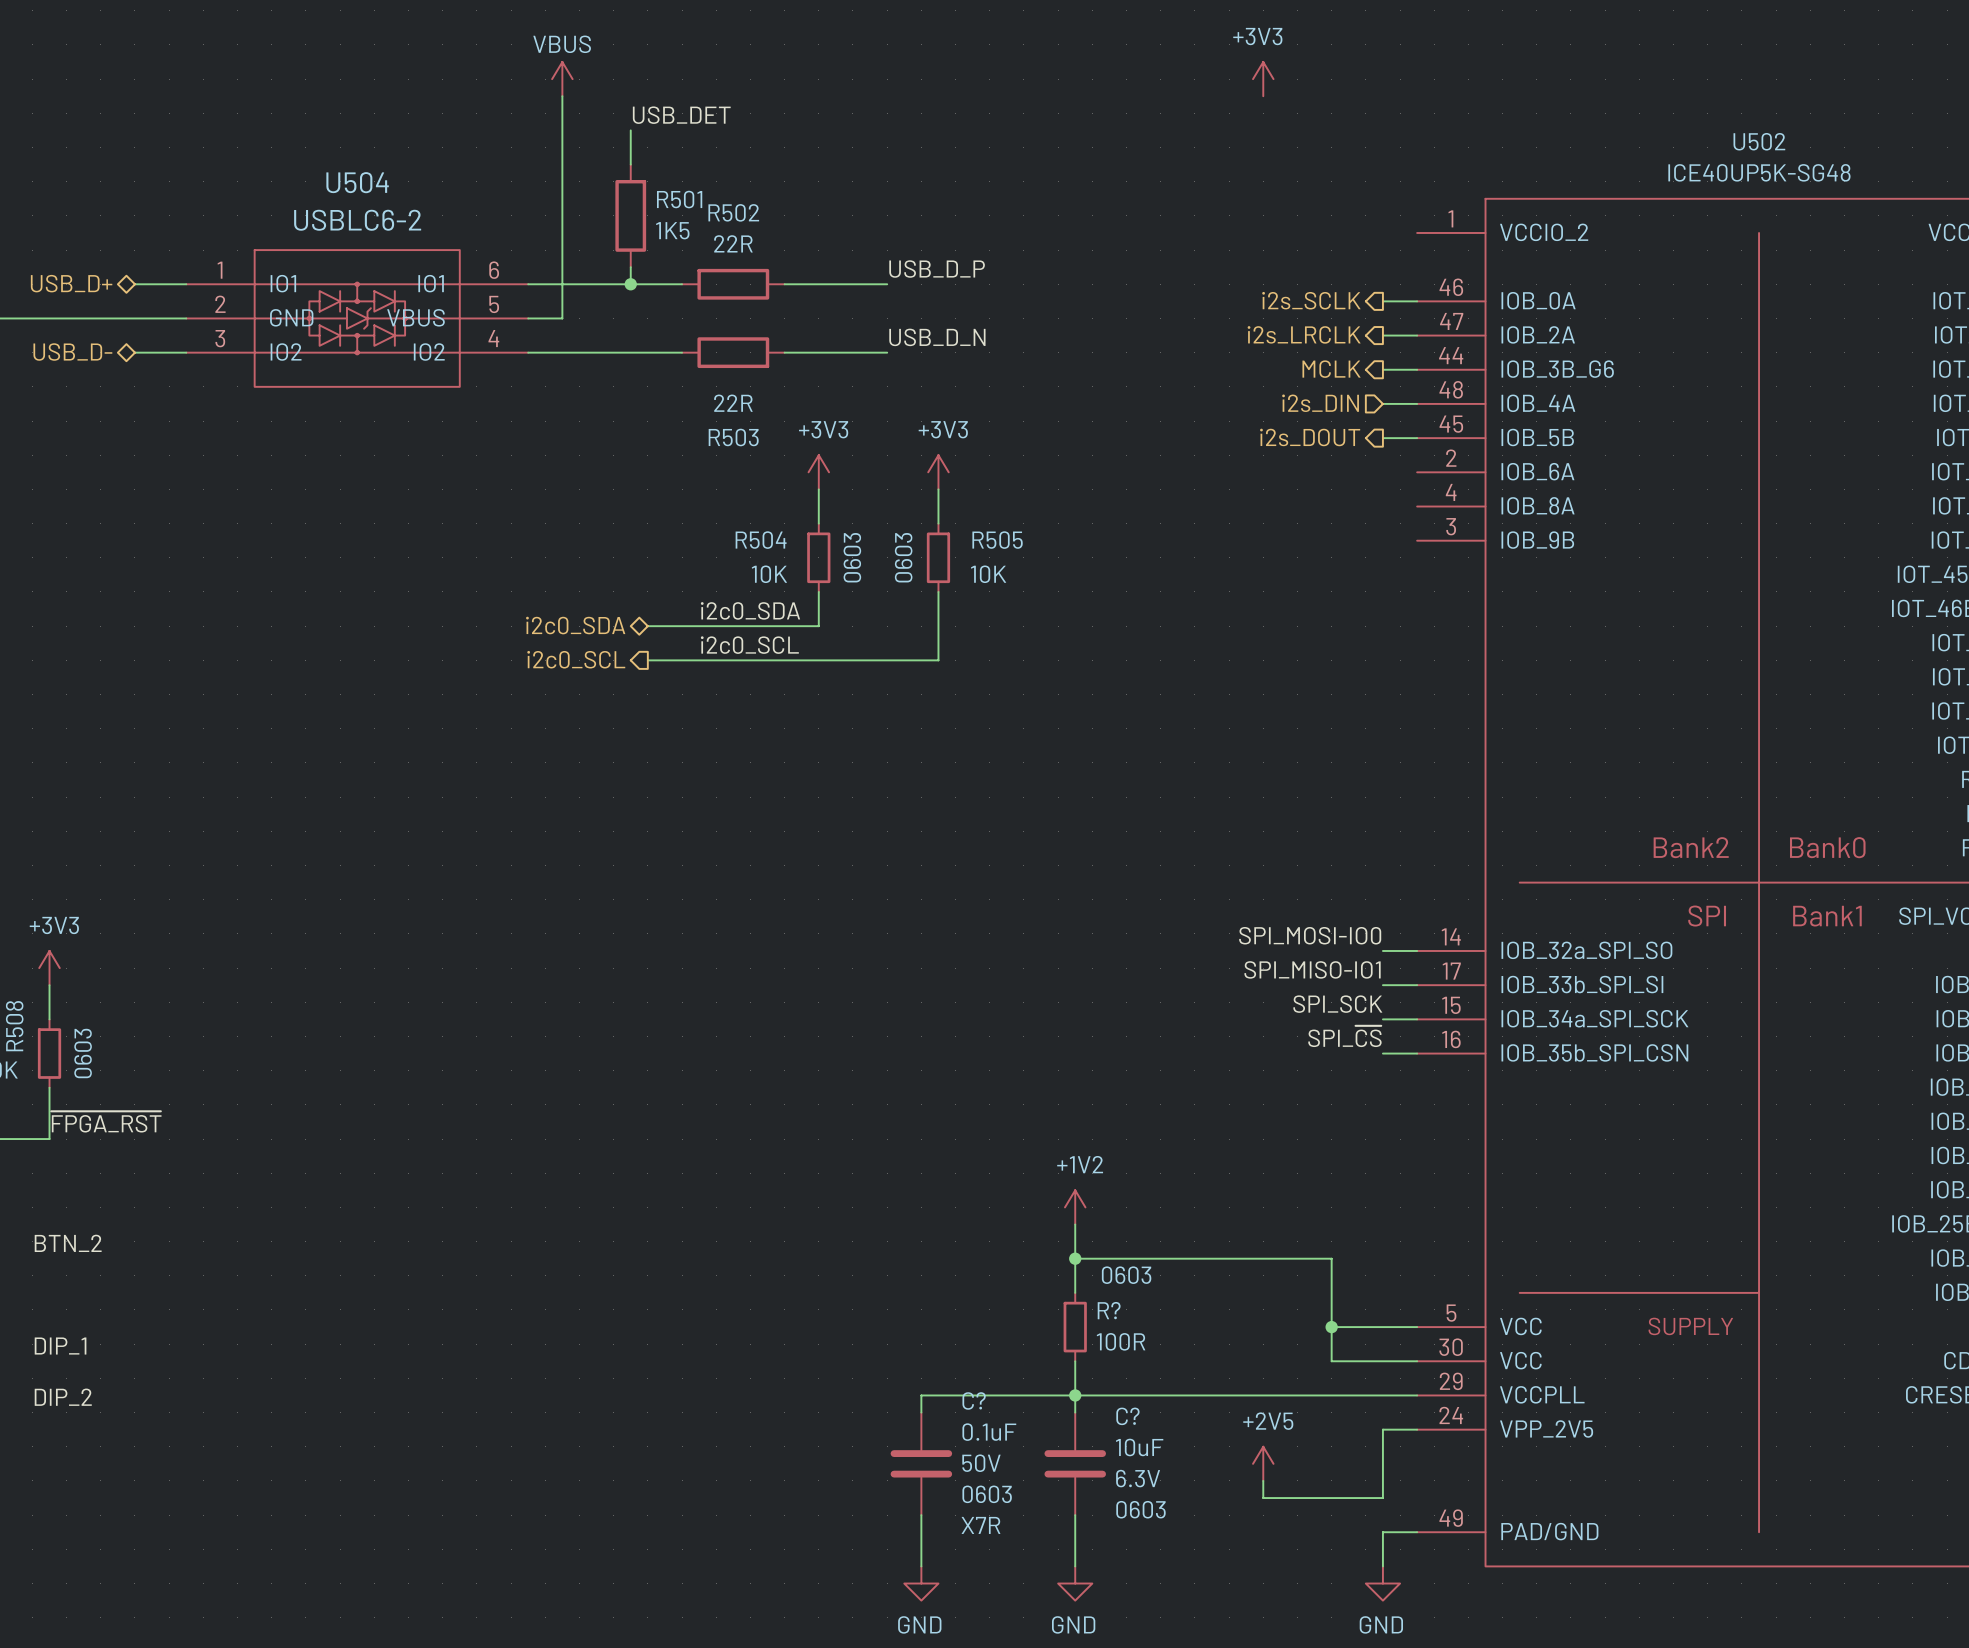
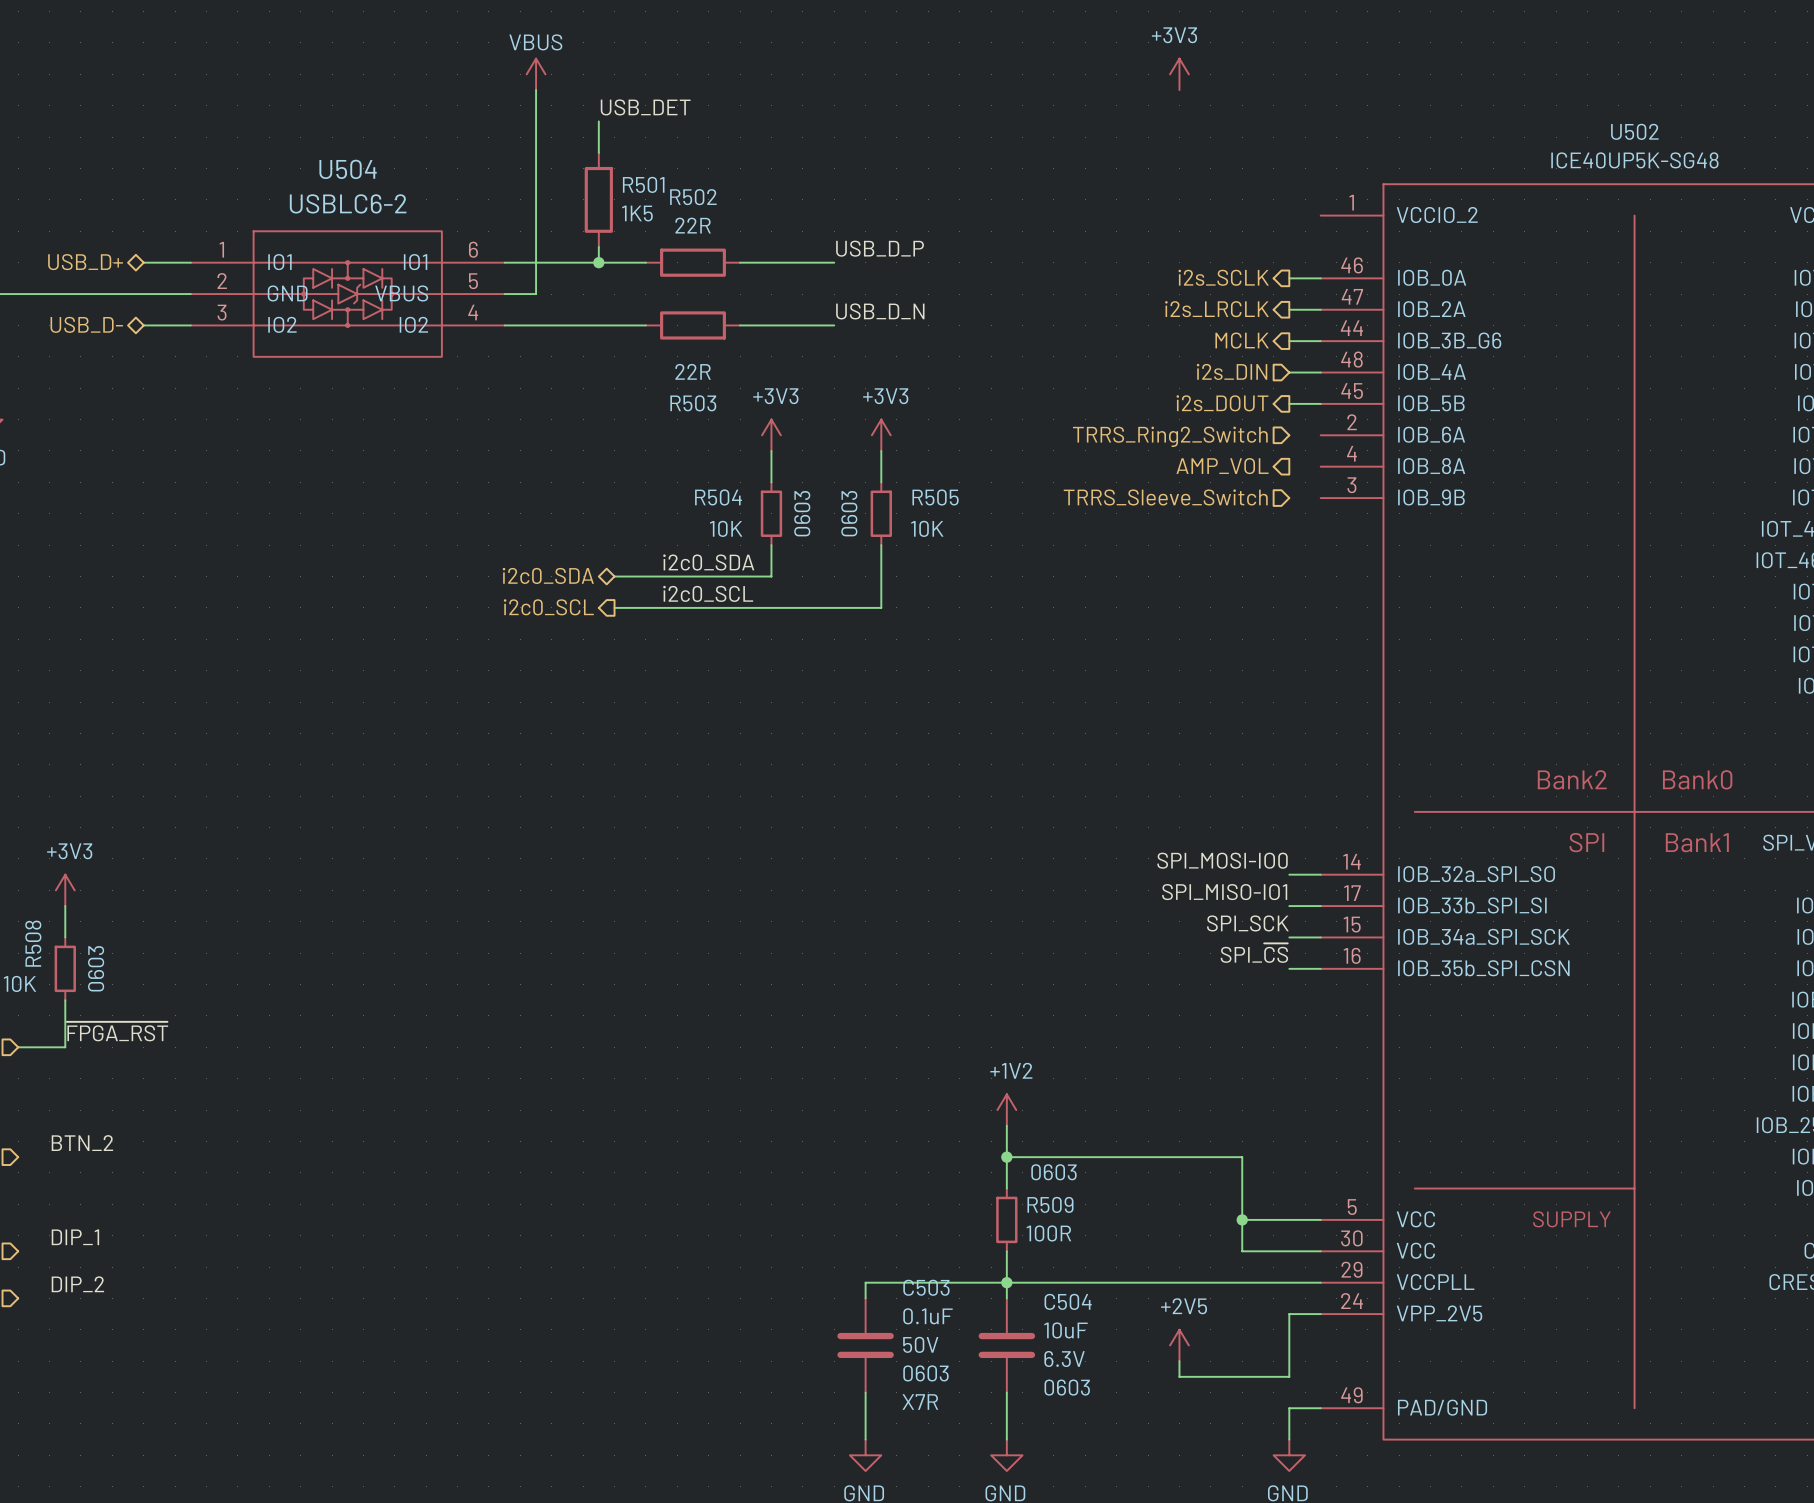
hierarchical label: none -> TRRS_Ring2_Switch (1170, 436)
hierarchical label: none -> AMP_VOL (1222, 466)
hierarchical label: none -> TRRS_Sleeve_Switch (1165, 497)
R? name: R? (1109, 1310) -> R509 (1050, 1204)
C? name: C? (974, 1400) -> C503 (926, 1287)
C? name: C? (1127, 1416) -> C504 (1068, 1301)

